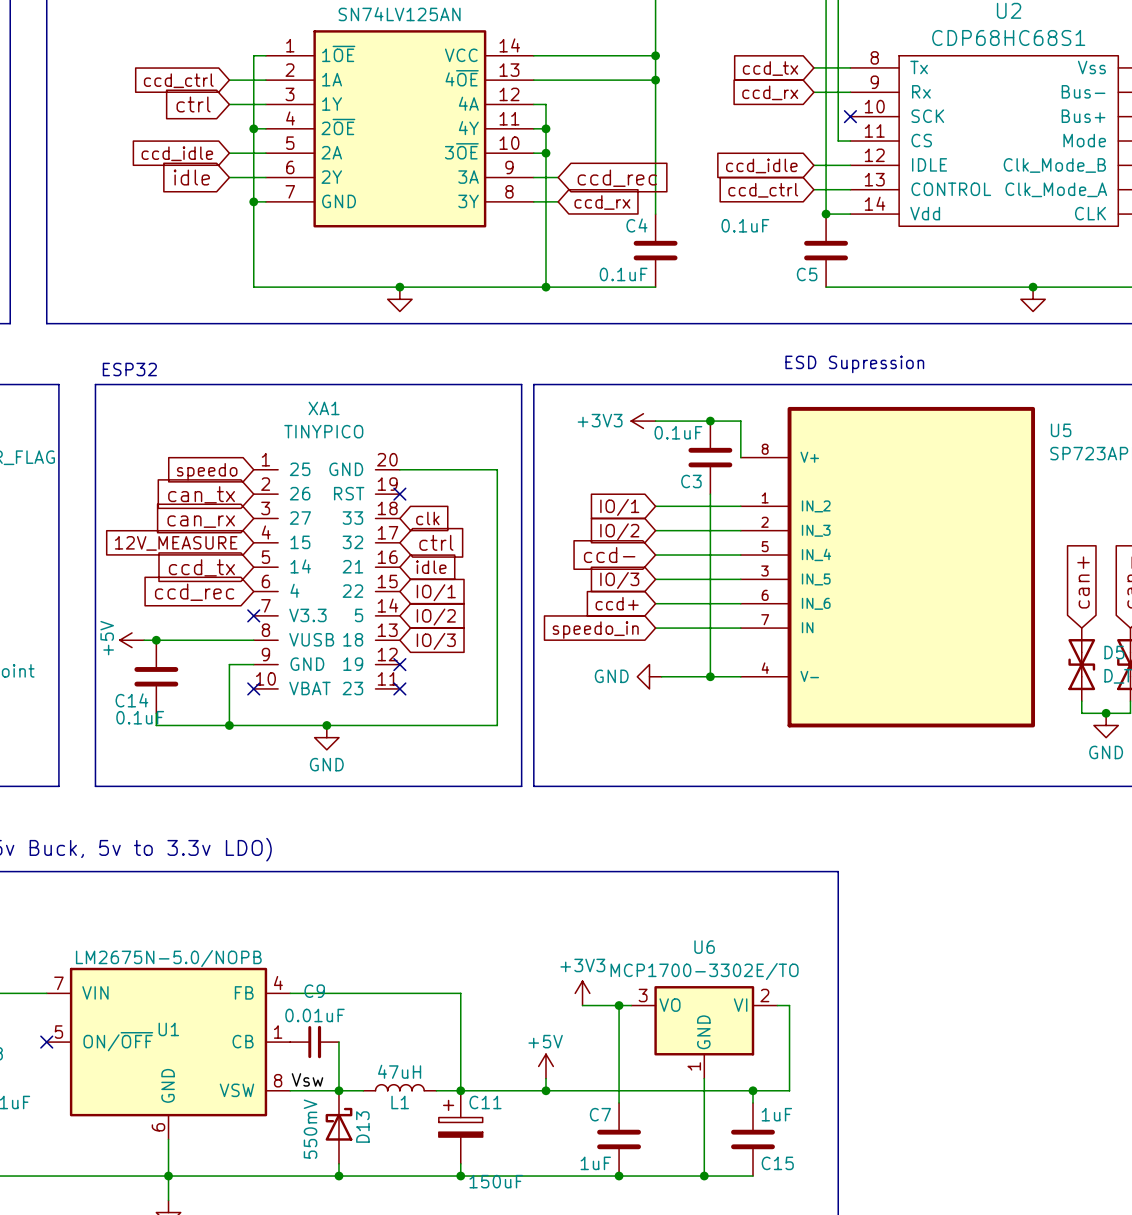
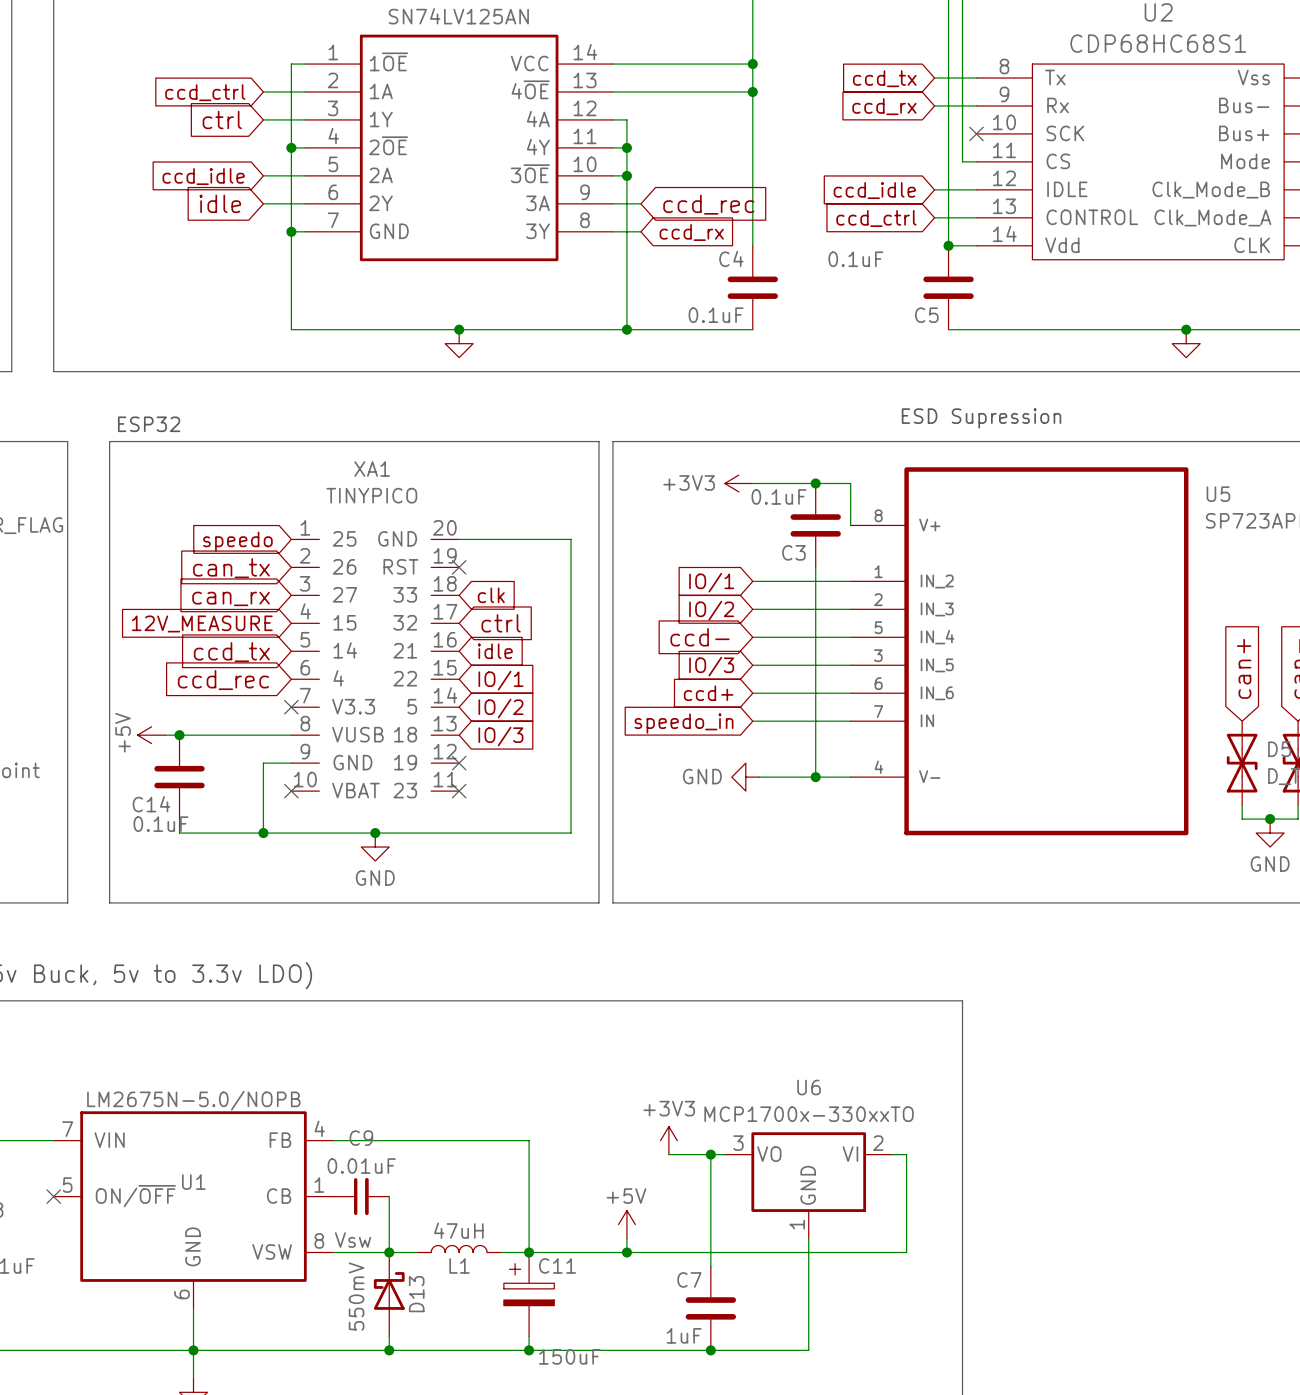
U6 value: MCP1700-3302E/TO (704, 971) -> MCP1700x-330xxTO (809, 1114)
wire: (753, 1090) (753, 1102) -> none
junction: (753, 1090) -> none
C15: 1uF (753, 1139) -> none
wire: (704, 1176) (753, 1176) -> none
junction: (704, 1176) -> none

